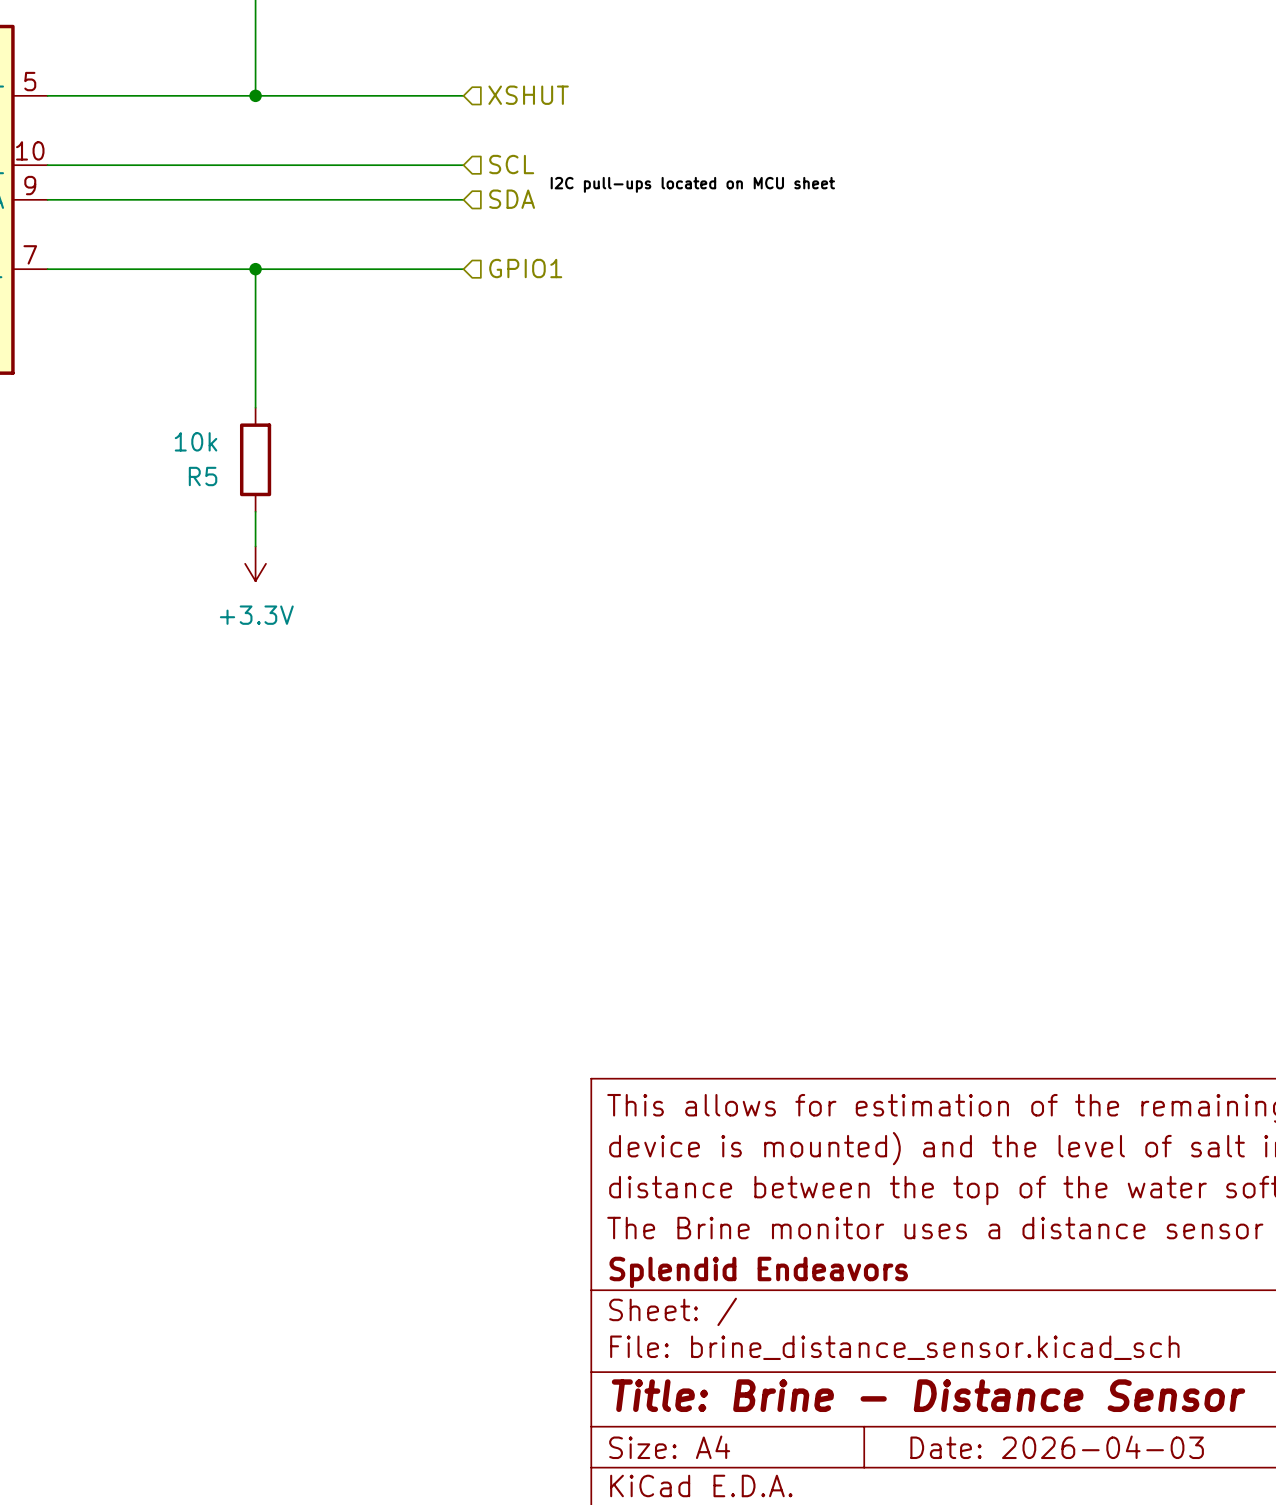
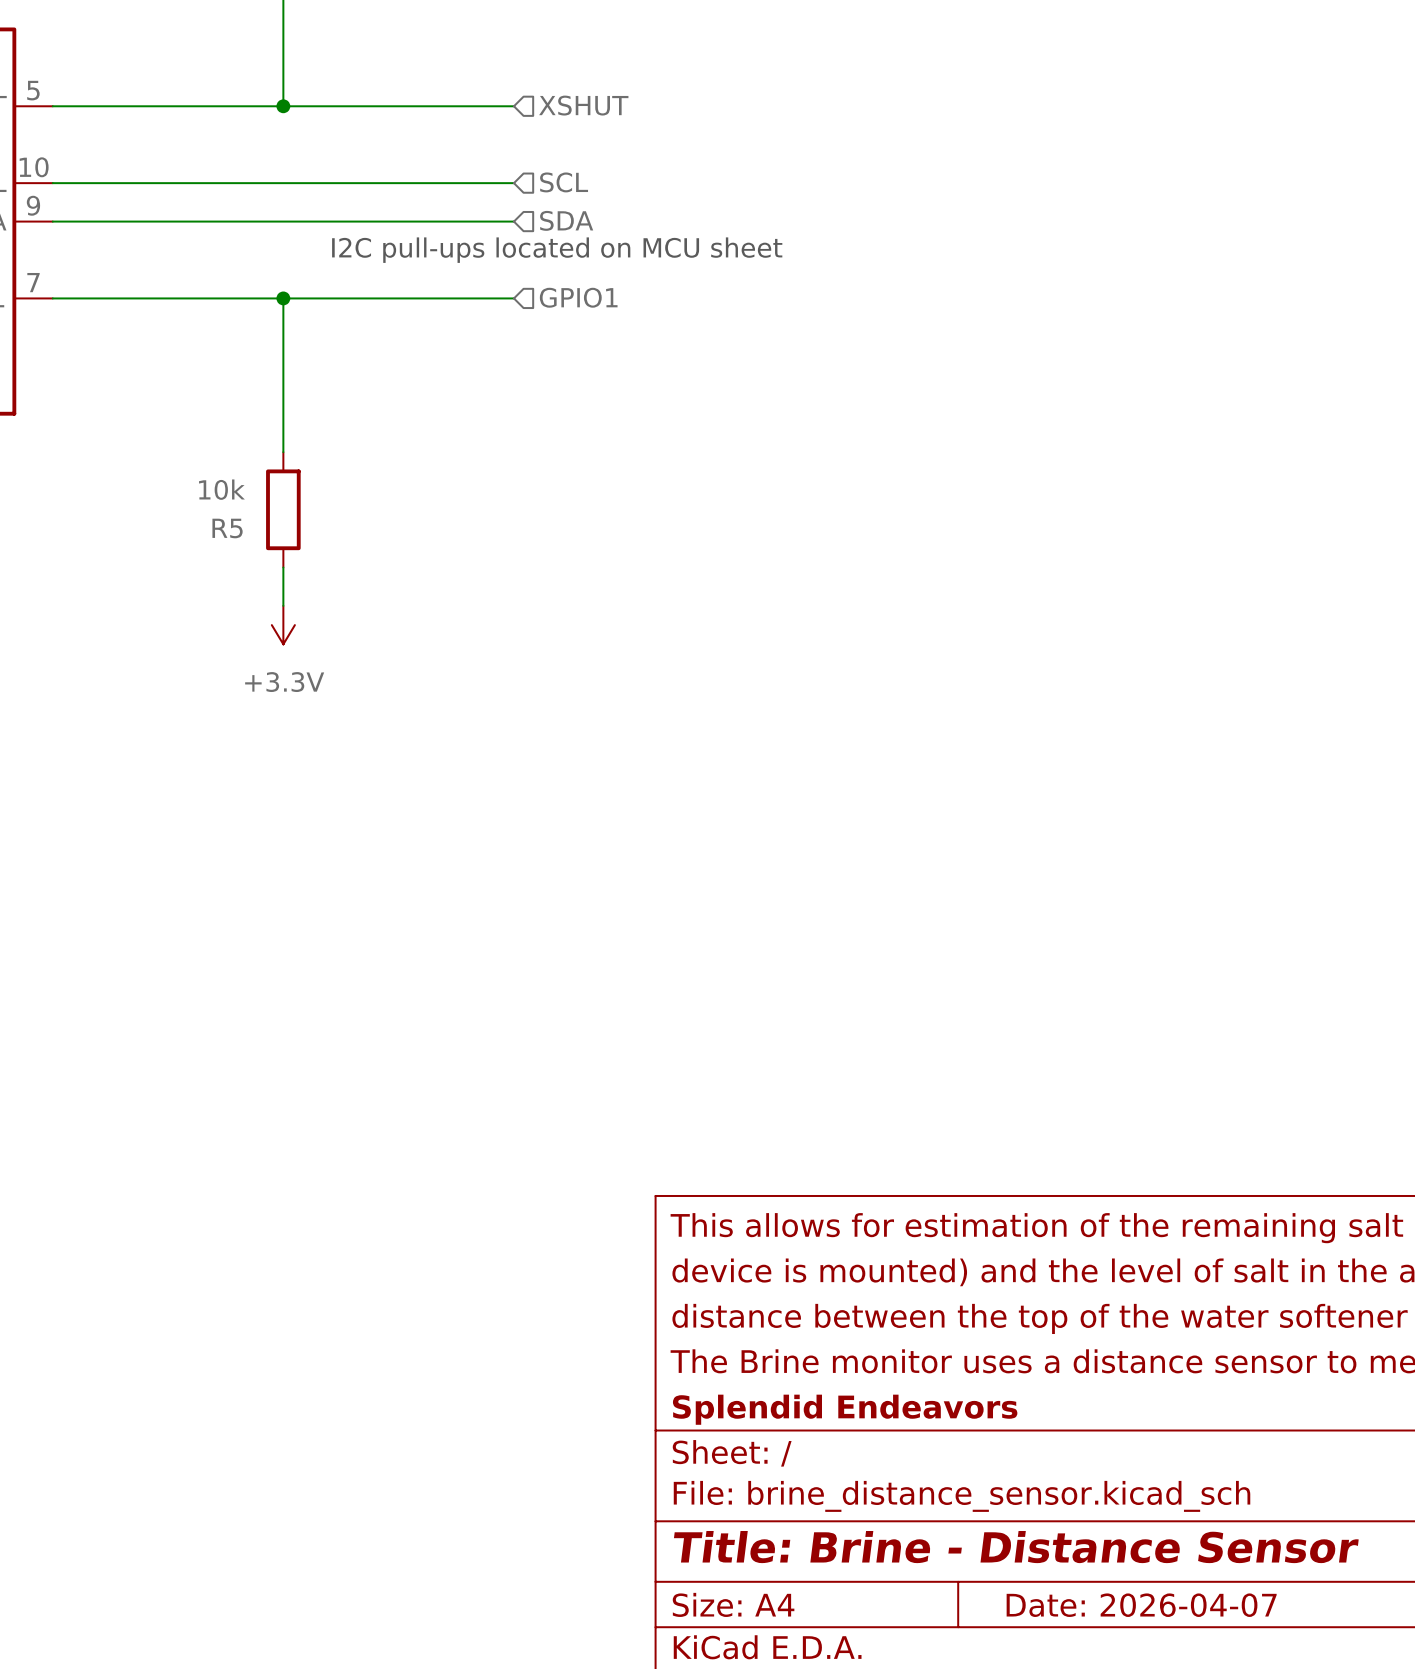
label: I2C pull-ups located on MCU sheet (692, 184) -> none
text: none -> I2C pull-ups located on MCU sheet (557, 250)
title block: Date: 2026-04-03 (1057, 1447) -> Date: 2026-04-07 (1141, 1605)

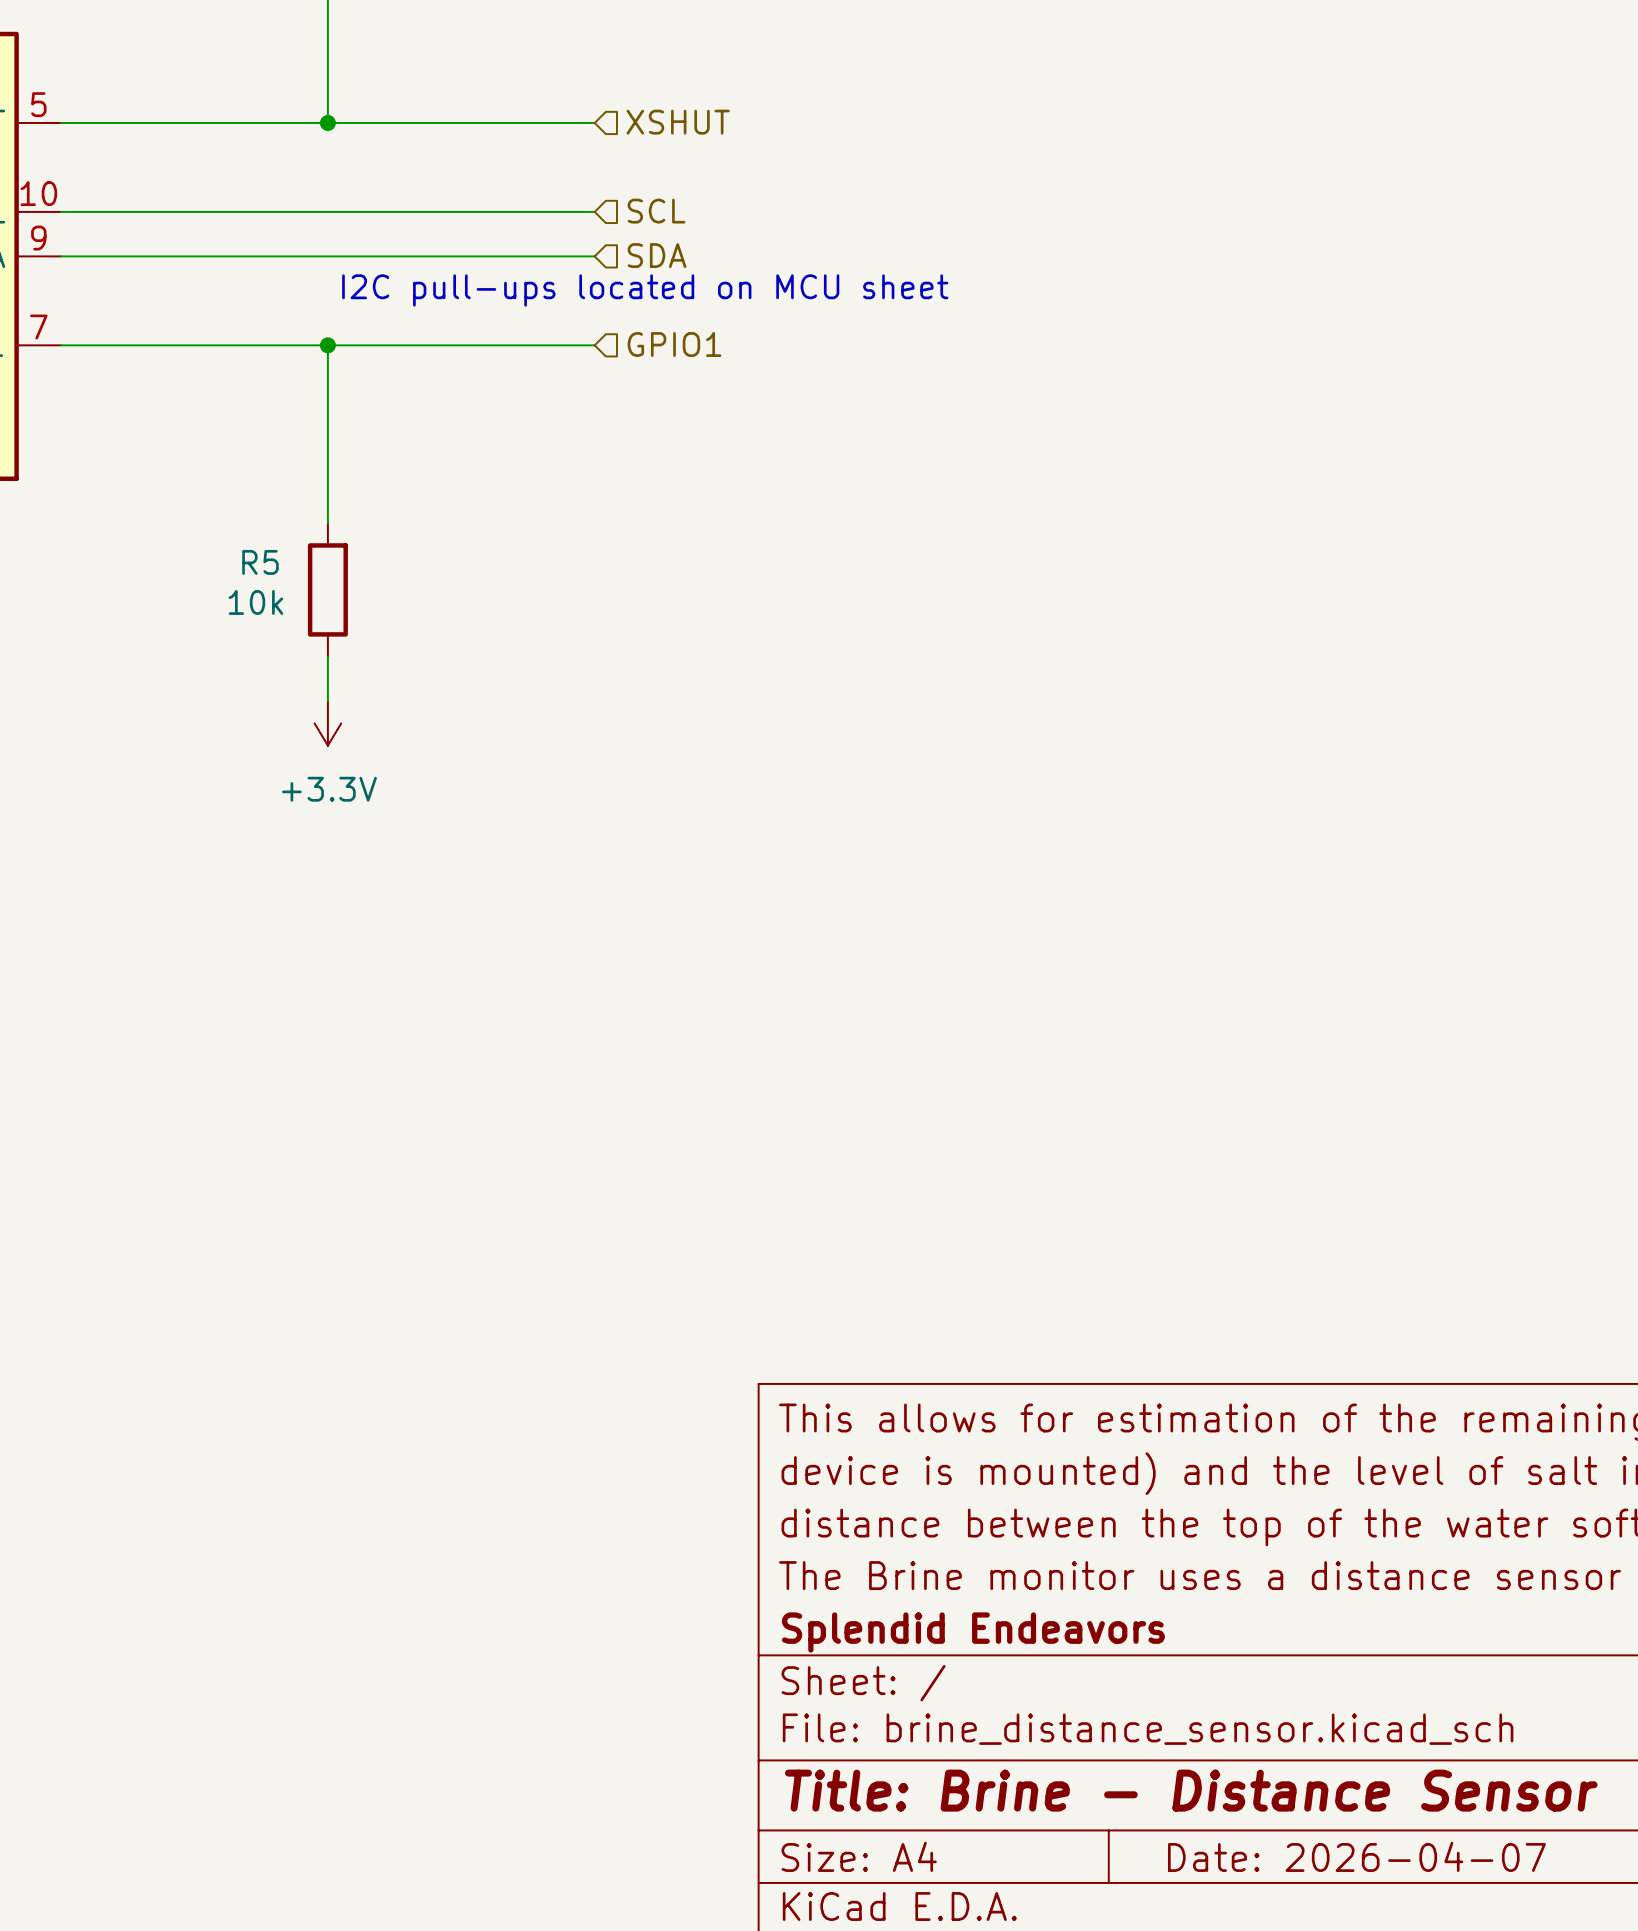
R5 value position: 10k (221, 489) -> 10k (255, 602)
R5 name position: R5 (227, 528) -> R5 (260, 562)

